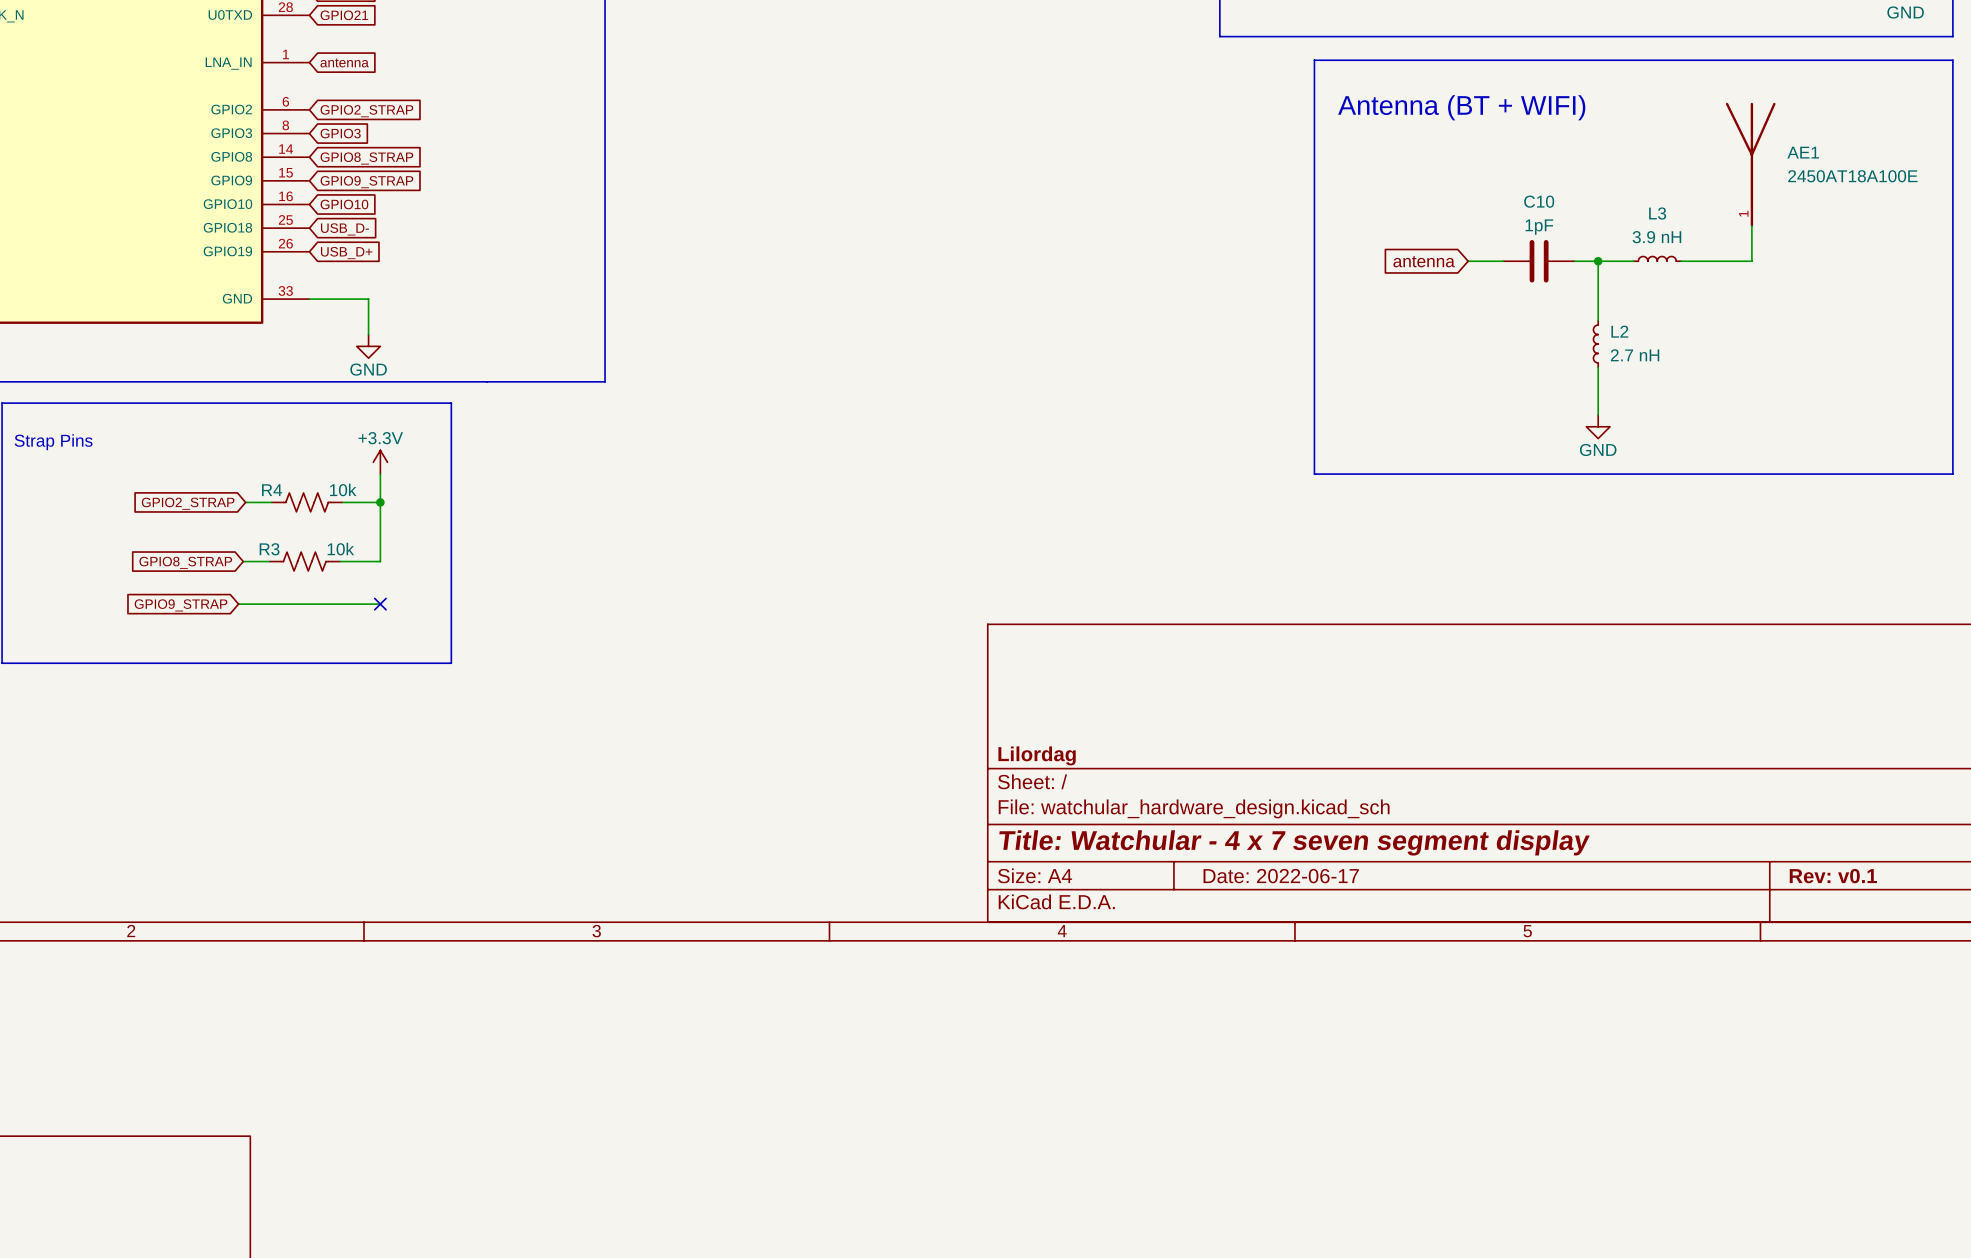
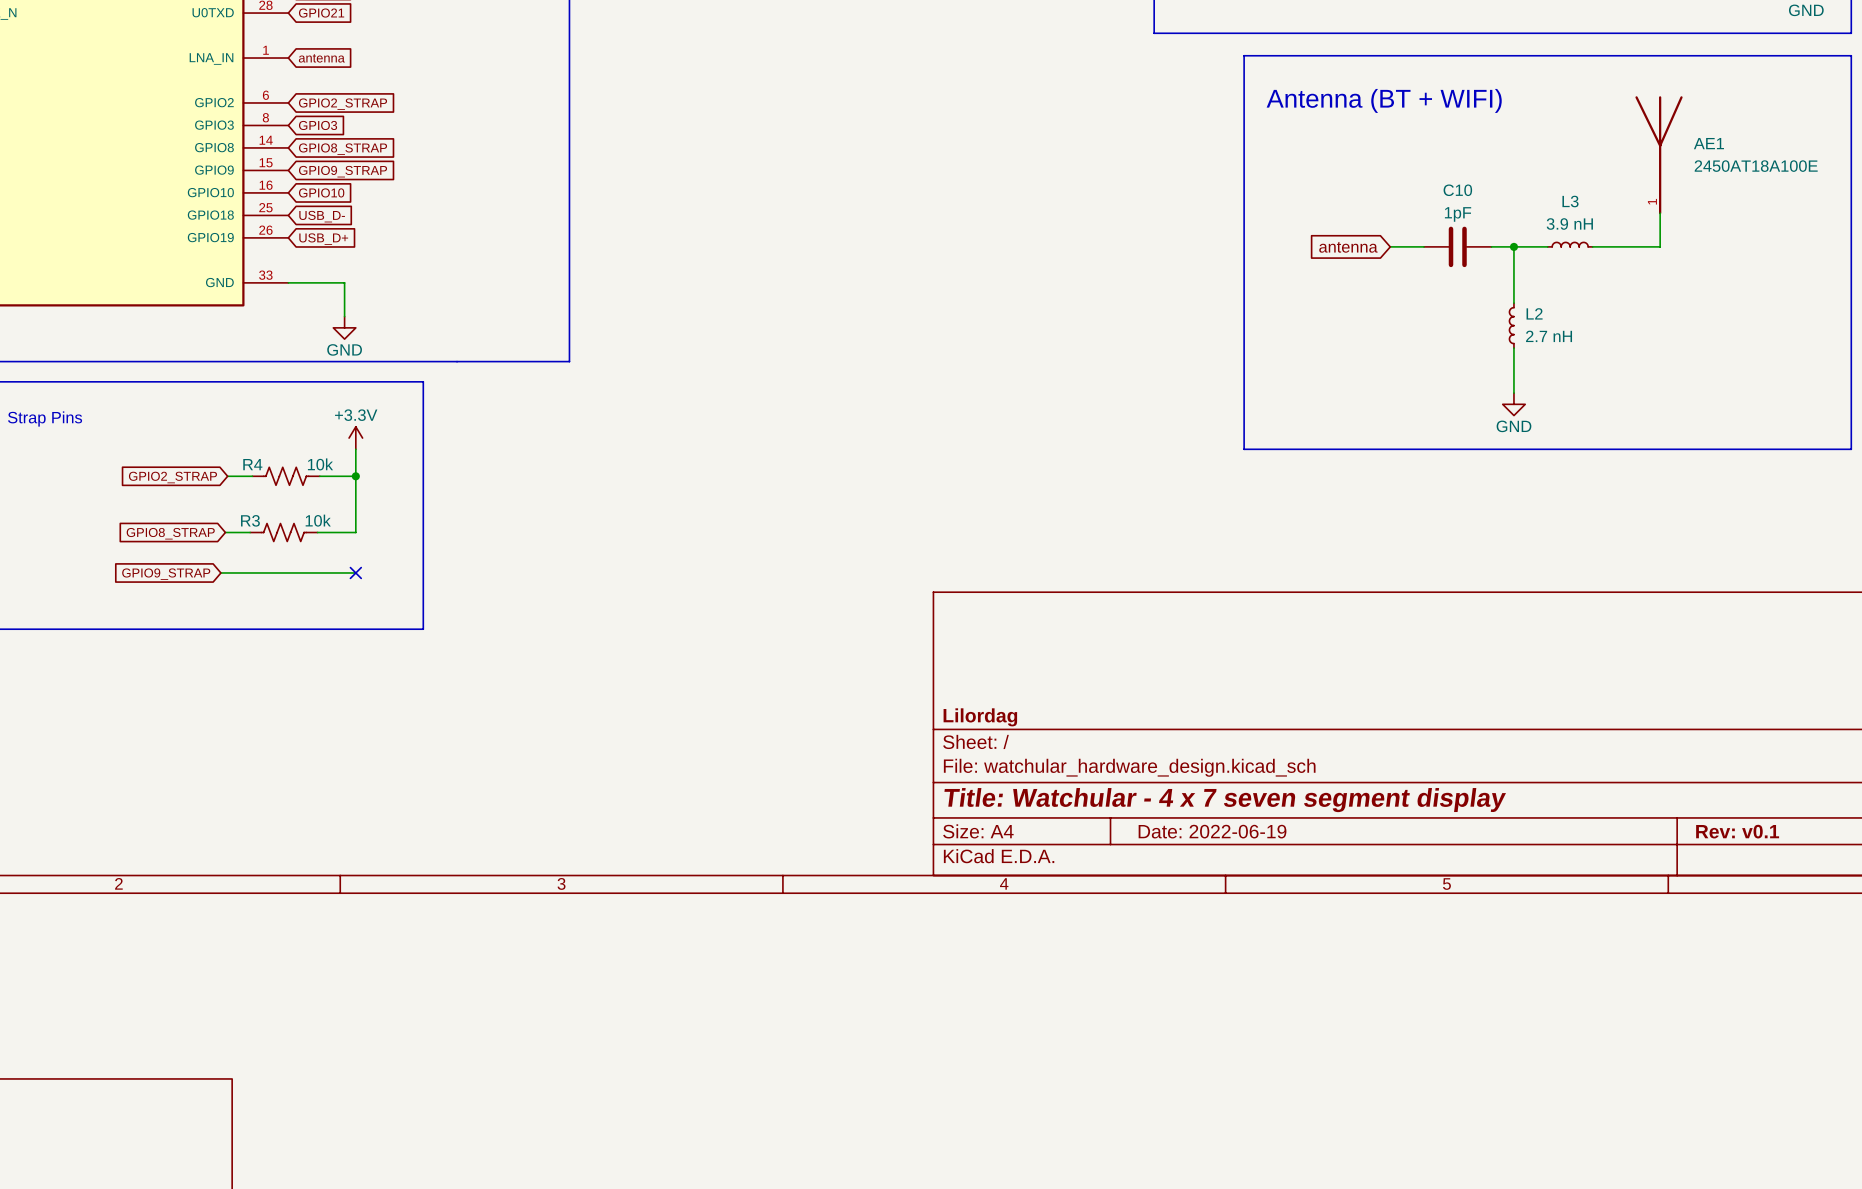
title block: Date: 2022-06-17 (1281, 876) -> Date: 2022-06-19 (1212, 831)

